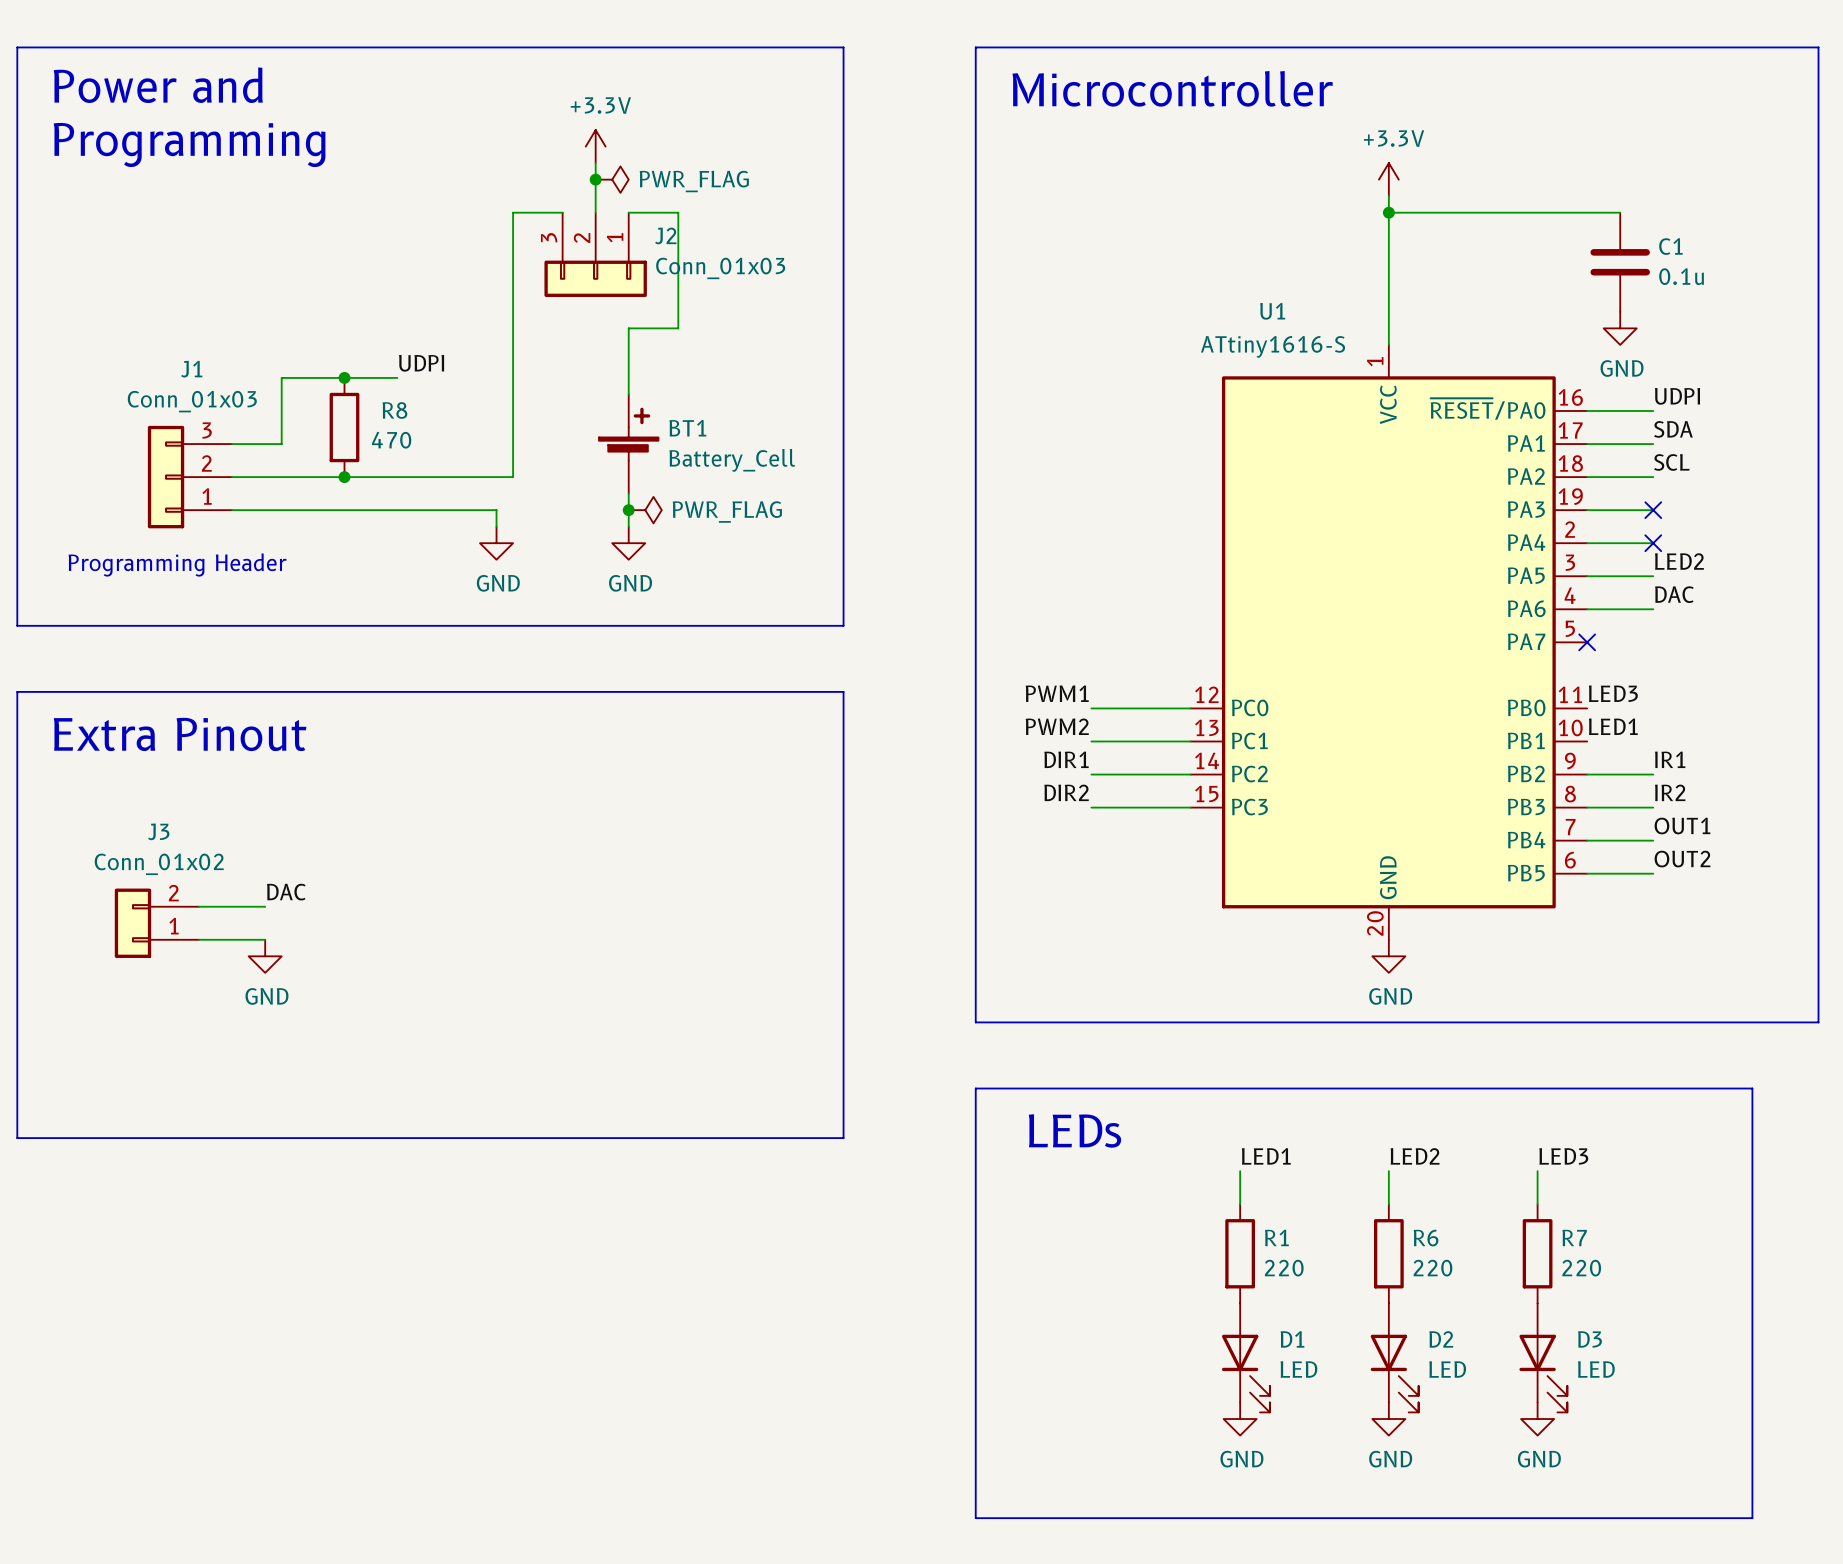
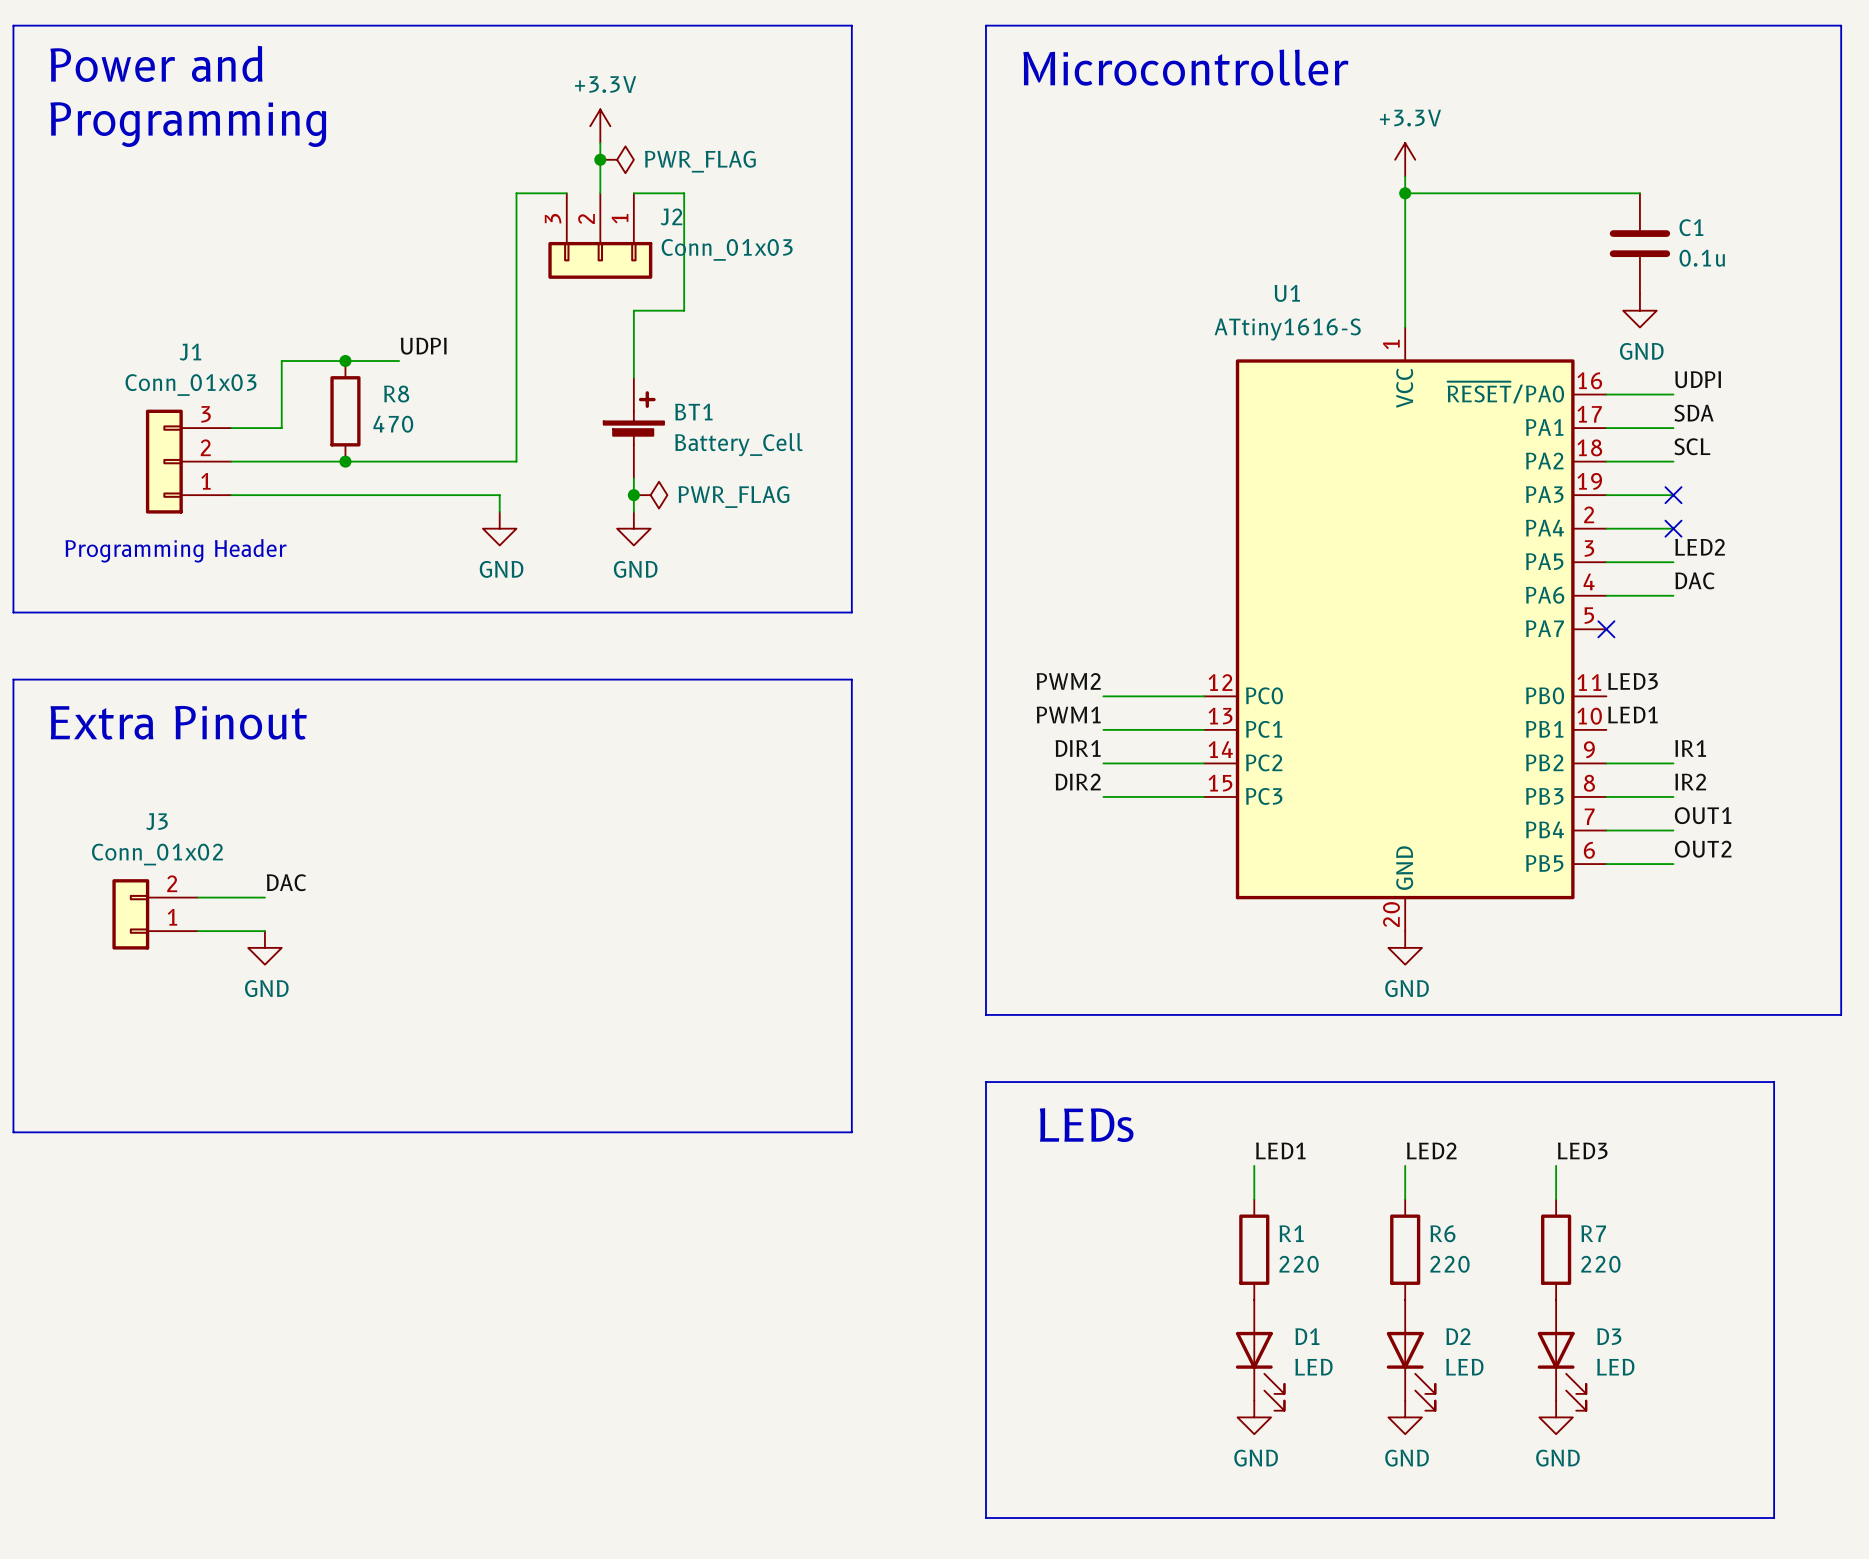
label: PWM1 (1057, 693) -> PWM2 (1068, 681)
label: PWM2 (1057, 726) -> PWM1 (1068, 714)

